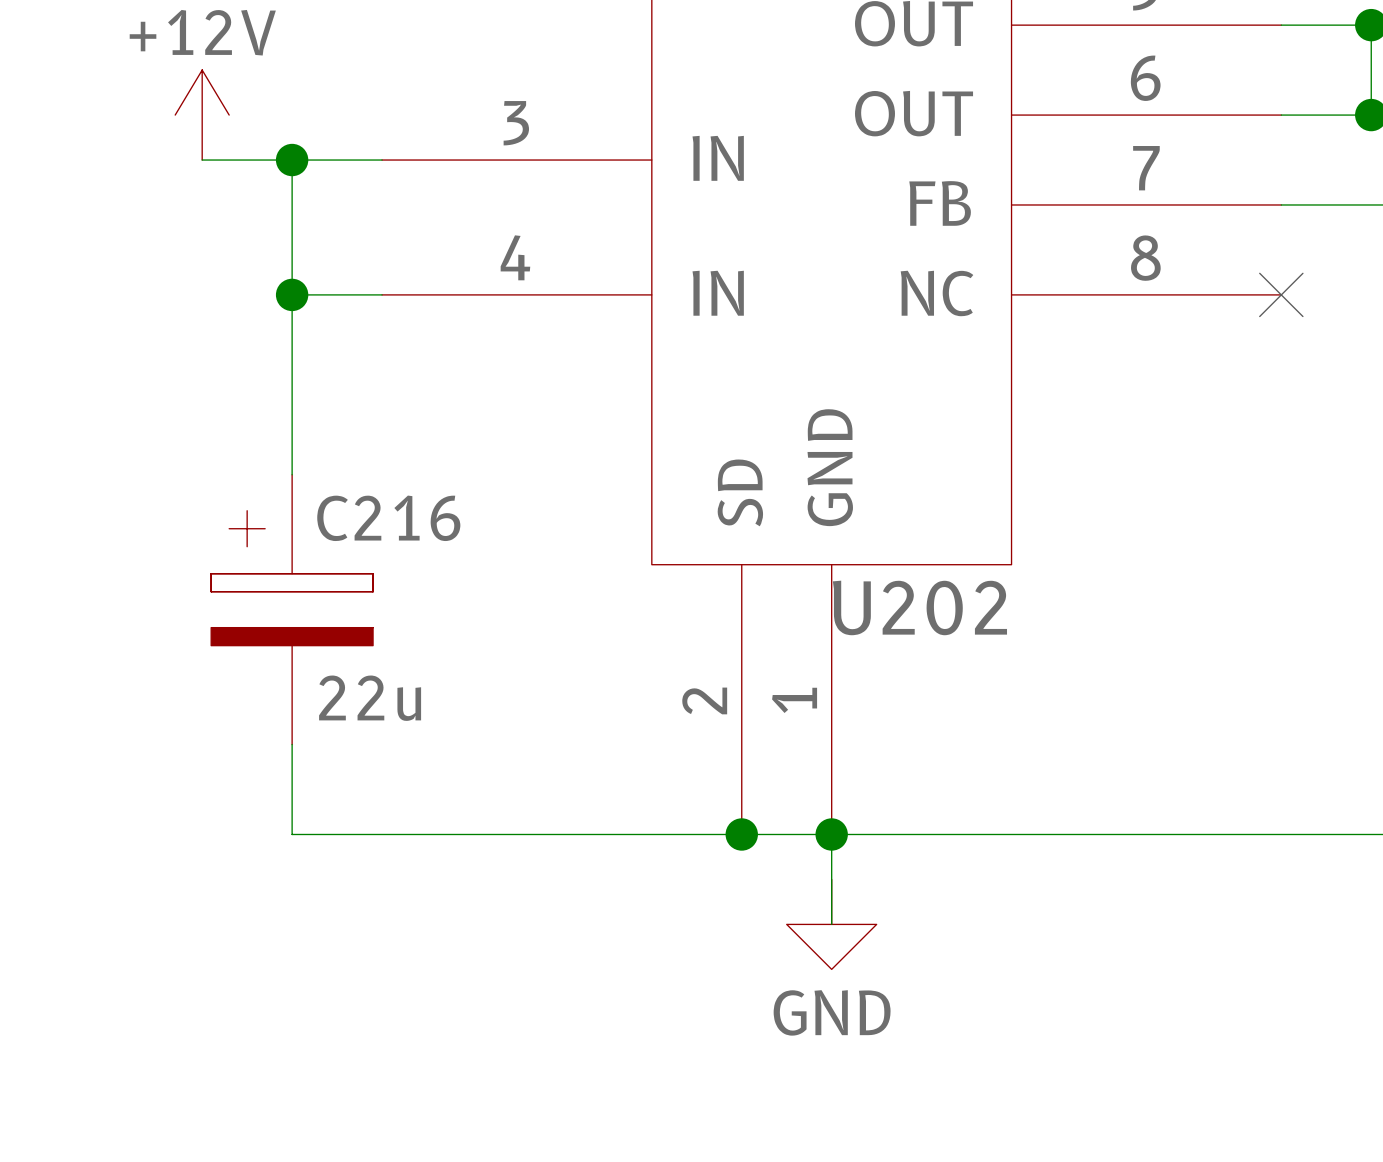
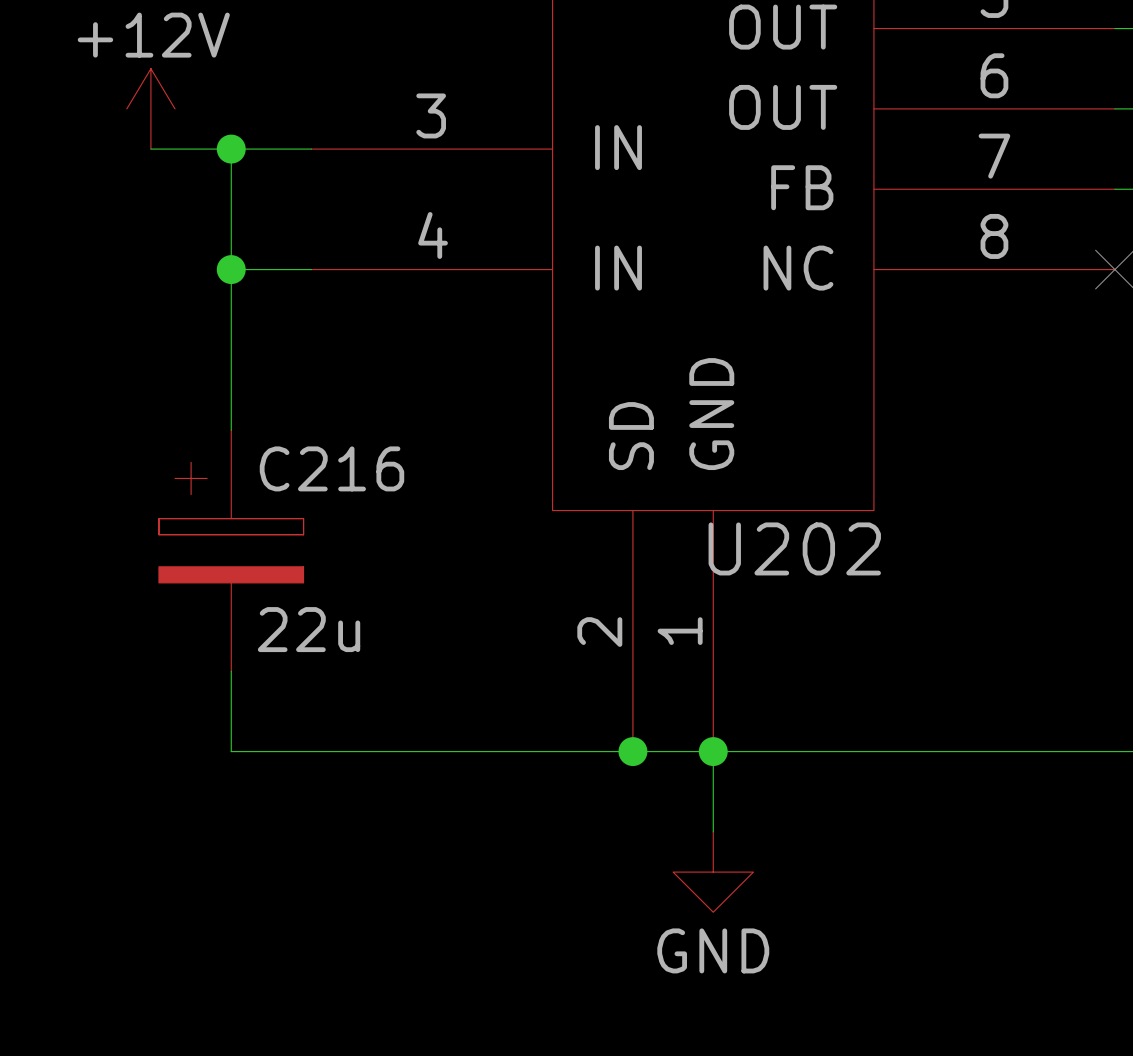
power symbol position: GND (831, 924) -> GND (713, 872)

